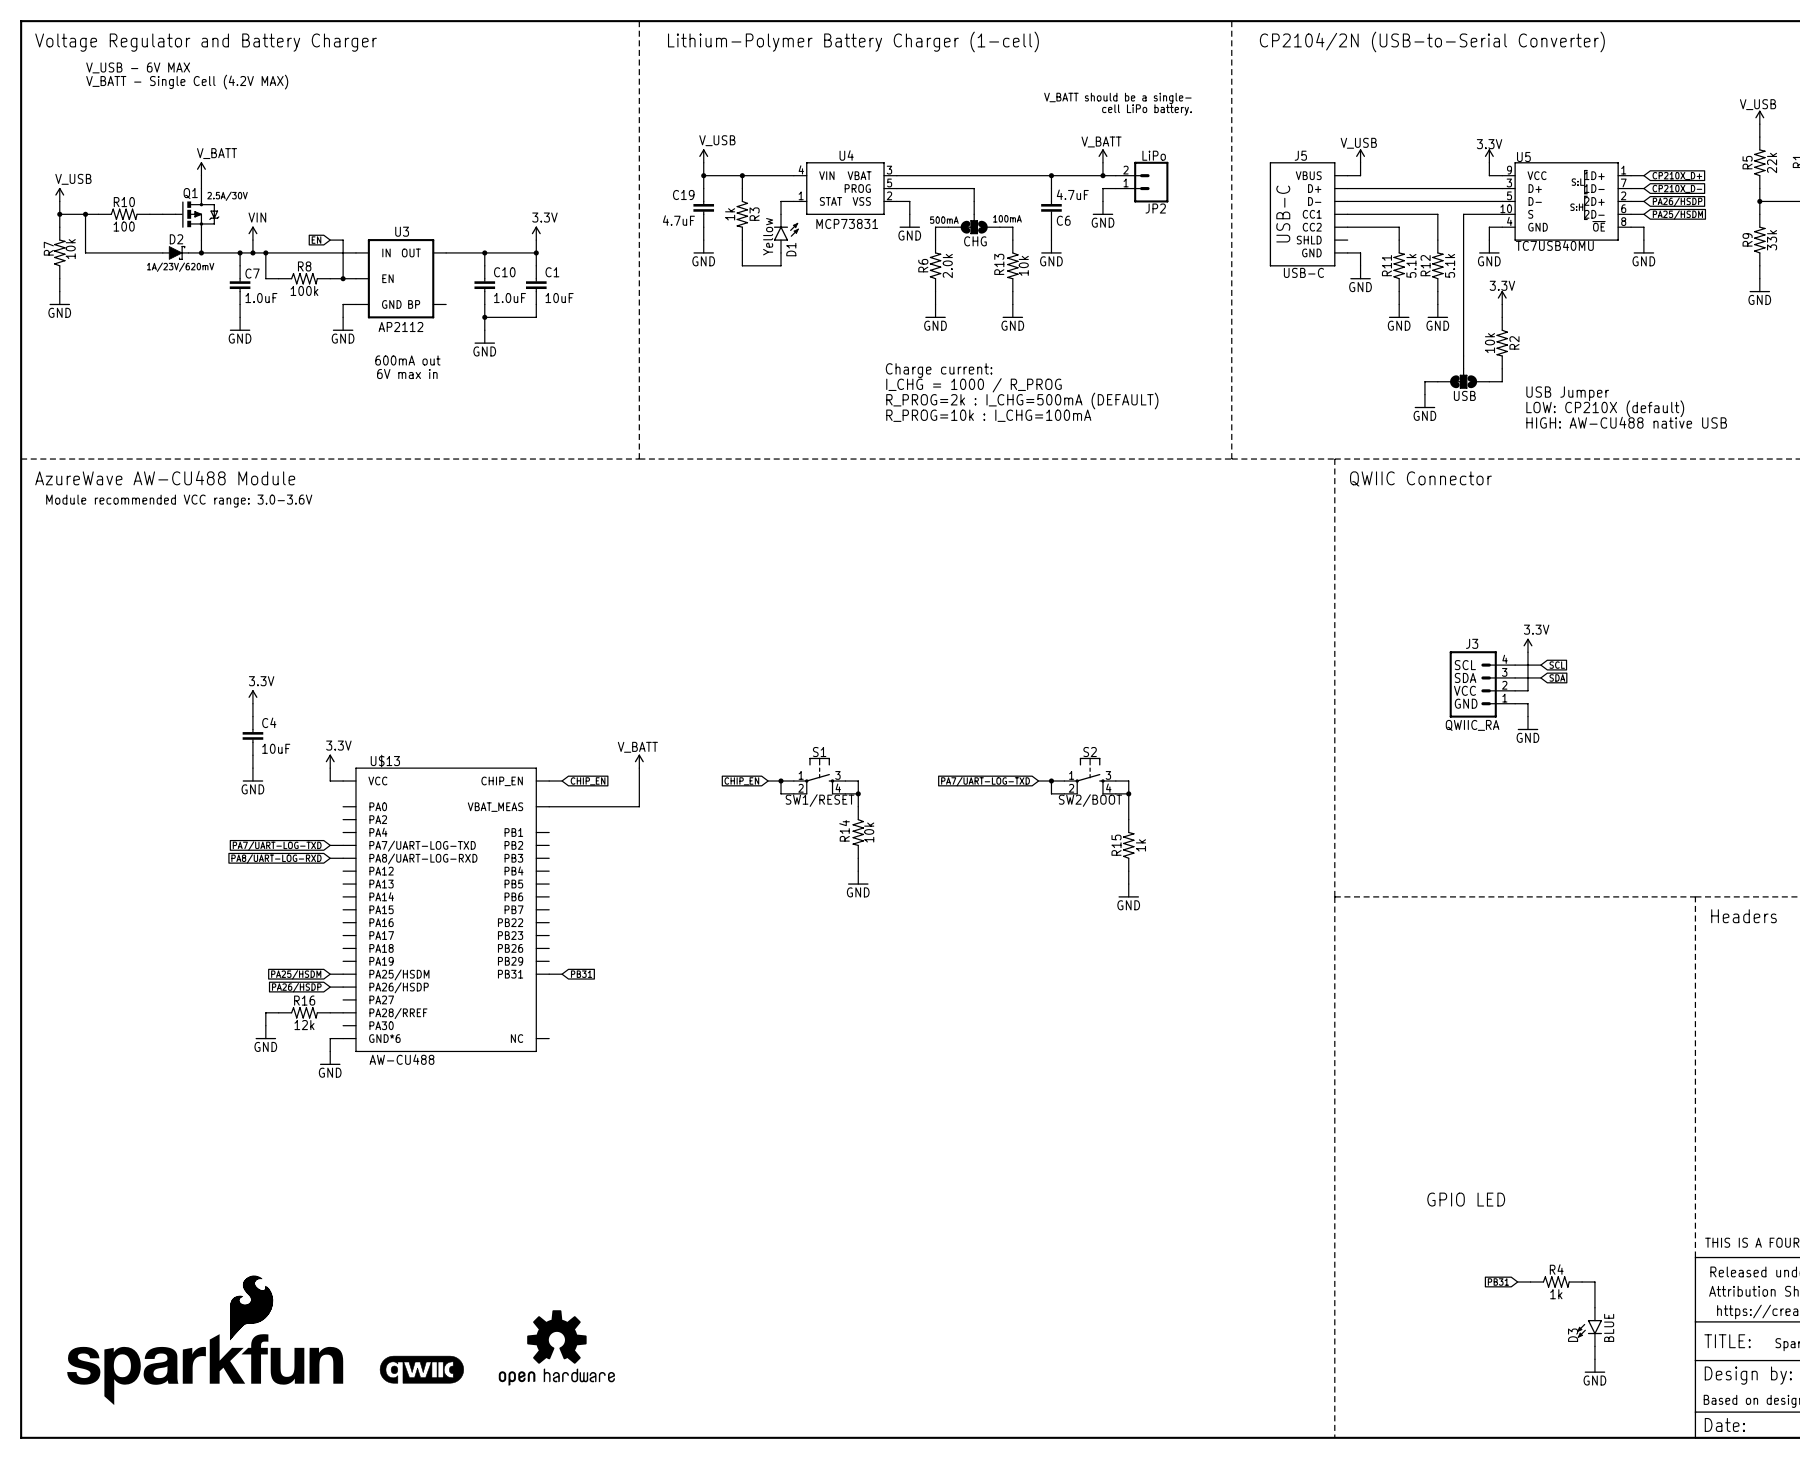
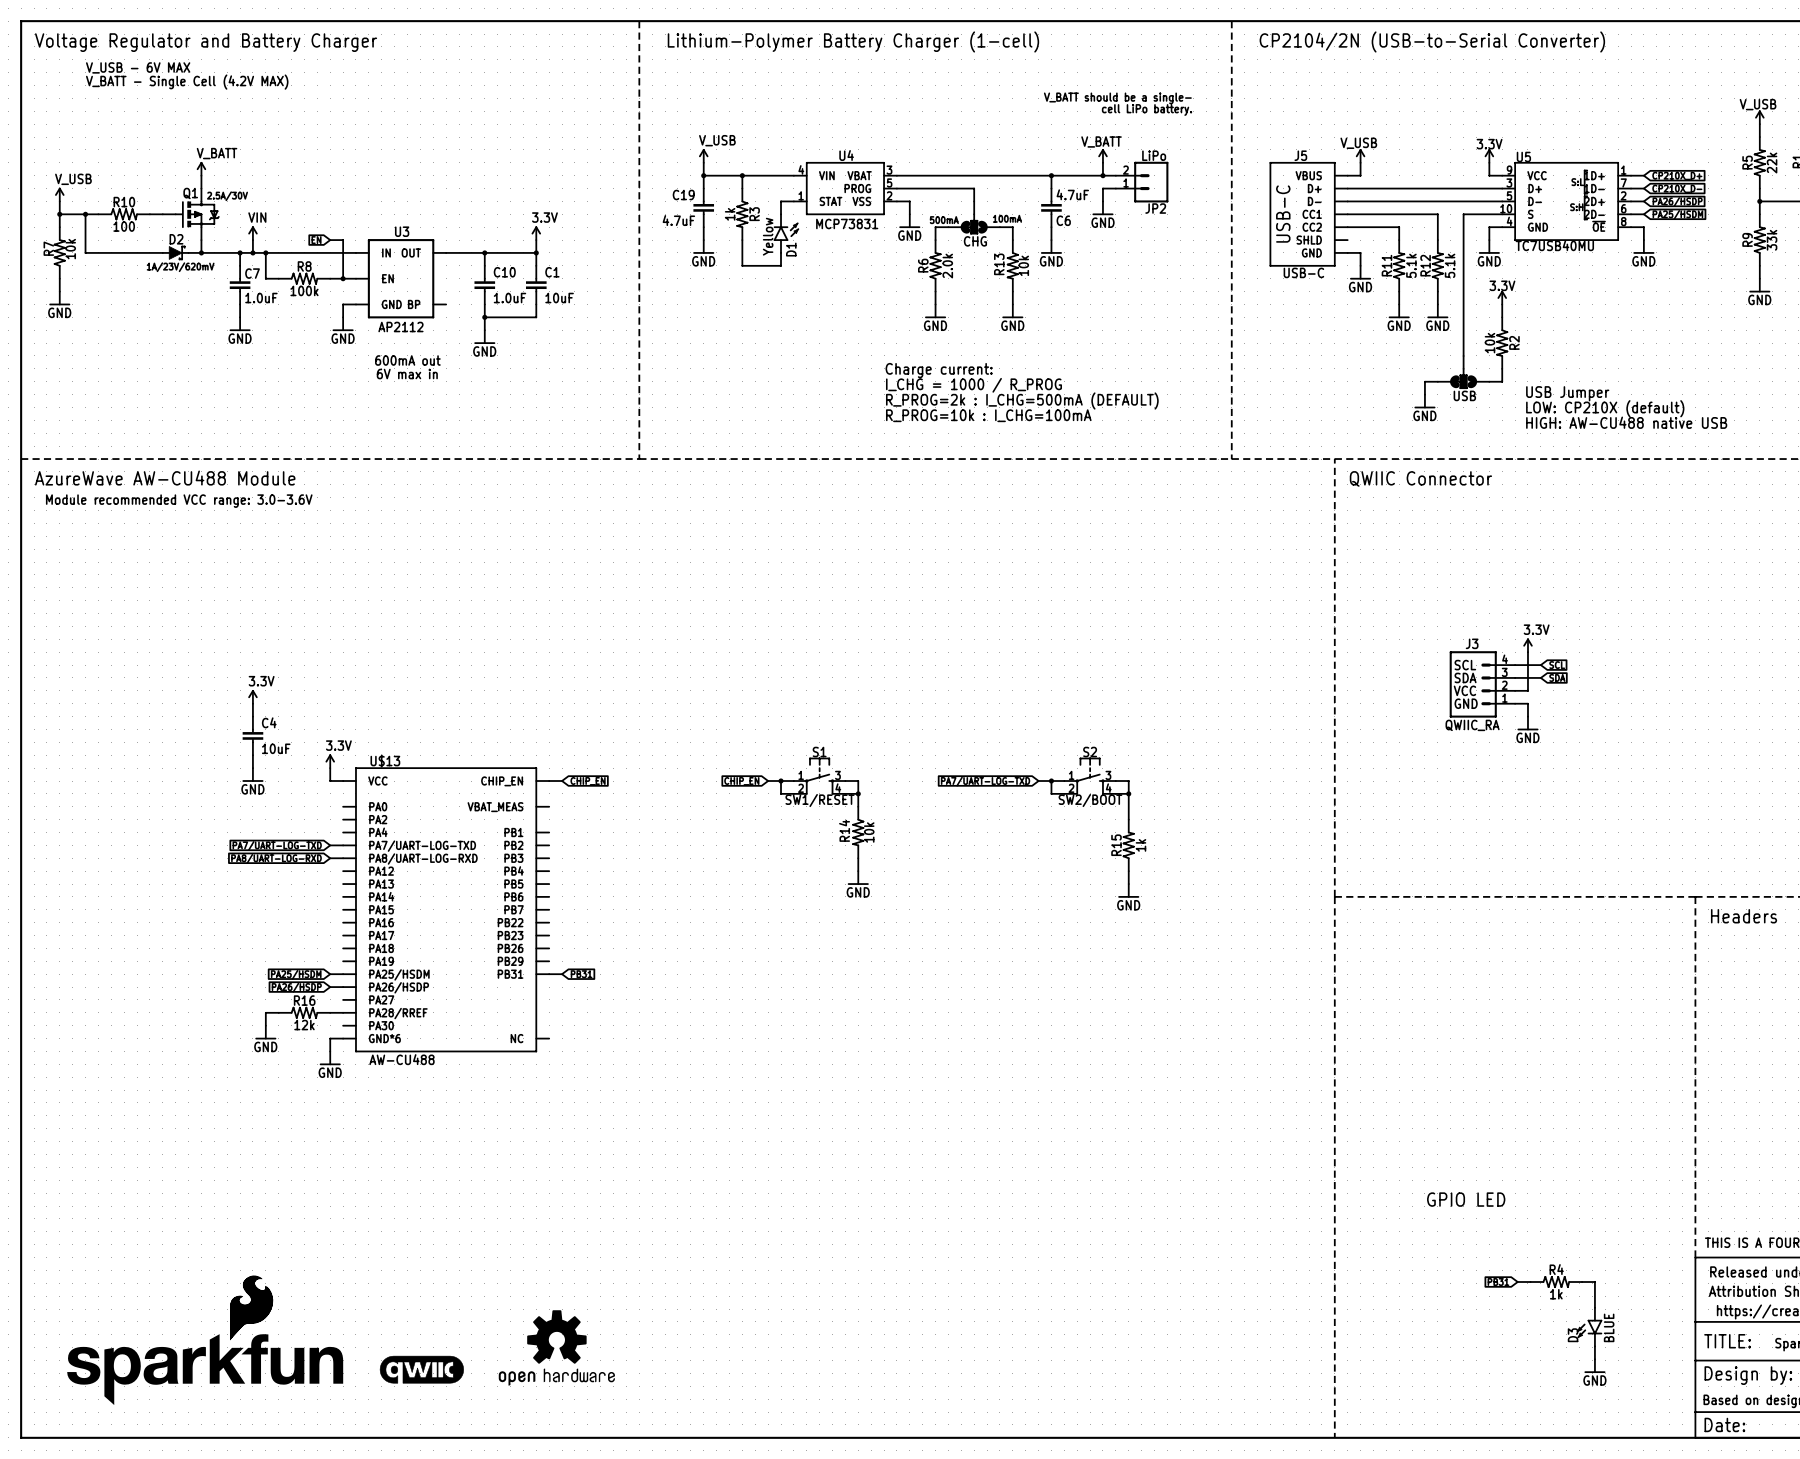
power symbol: V_BATT (639, 761) -> none
wire: (639, 768) (639, 806) (549, 806) -> none

